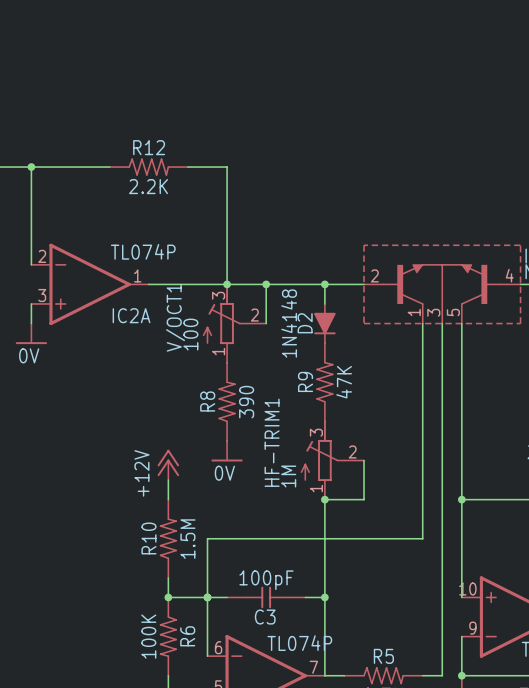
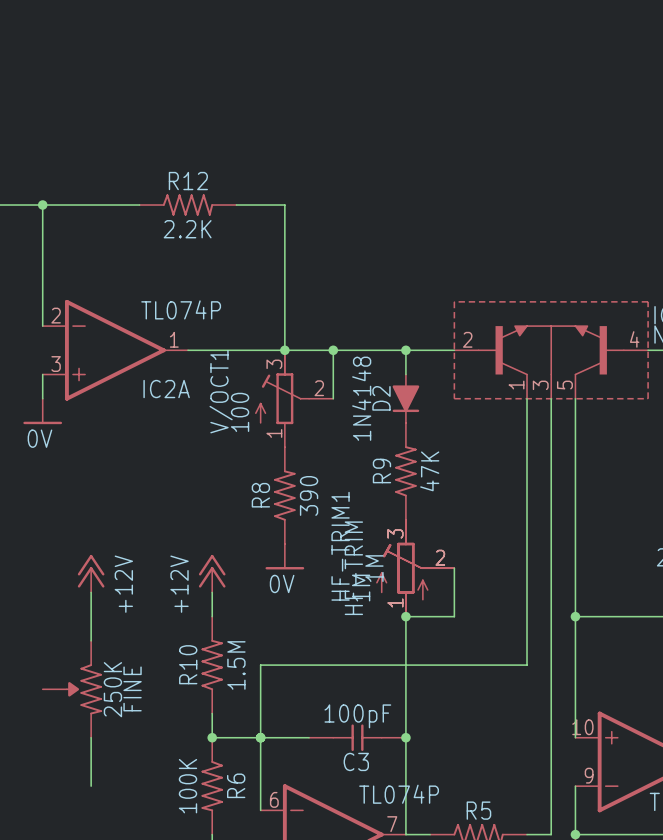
HF-TRIM: none -> 1M (418, 567)
power symbol: none -> +12V (91, 573)
wire: none -> (91, 592) (91, 640)
FINE: none -> 250K (72, 689)
wire: none -> (91, 737) (91, 786)
C3 position: (266, 597) -> (357, 737)
part value position: TL074P (299, 643) -> TL074P (399, 794)

